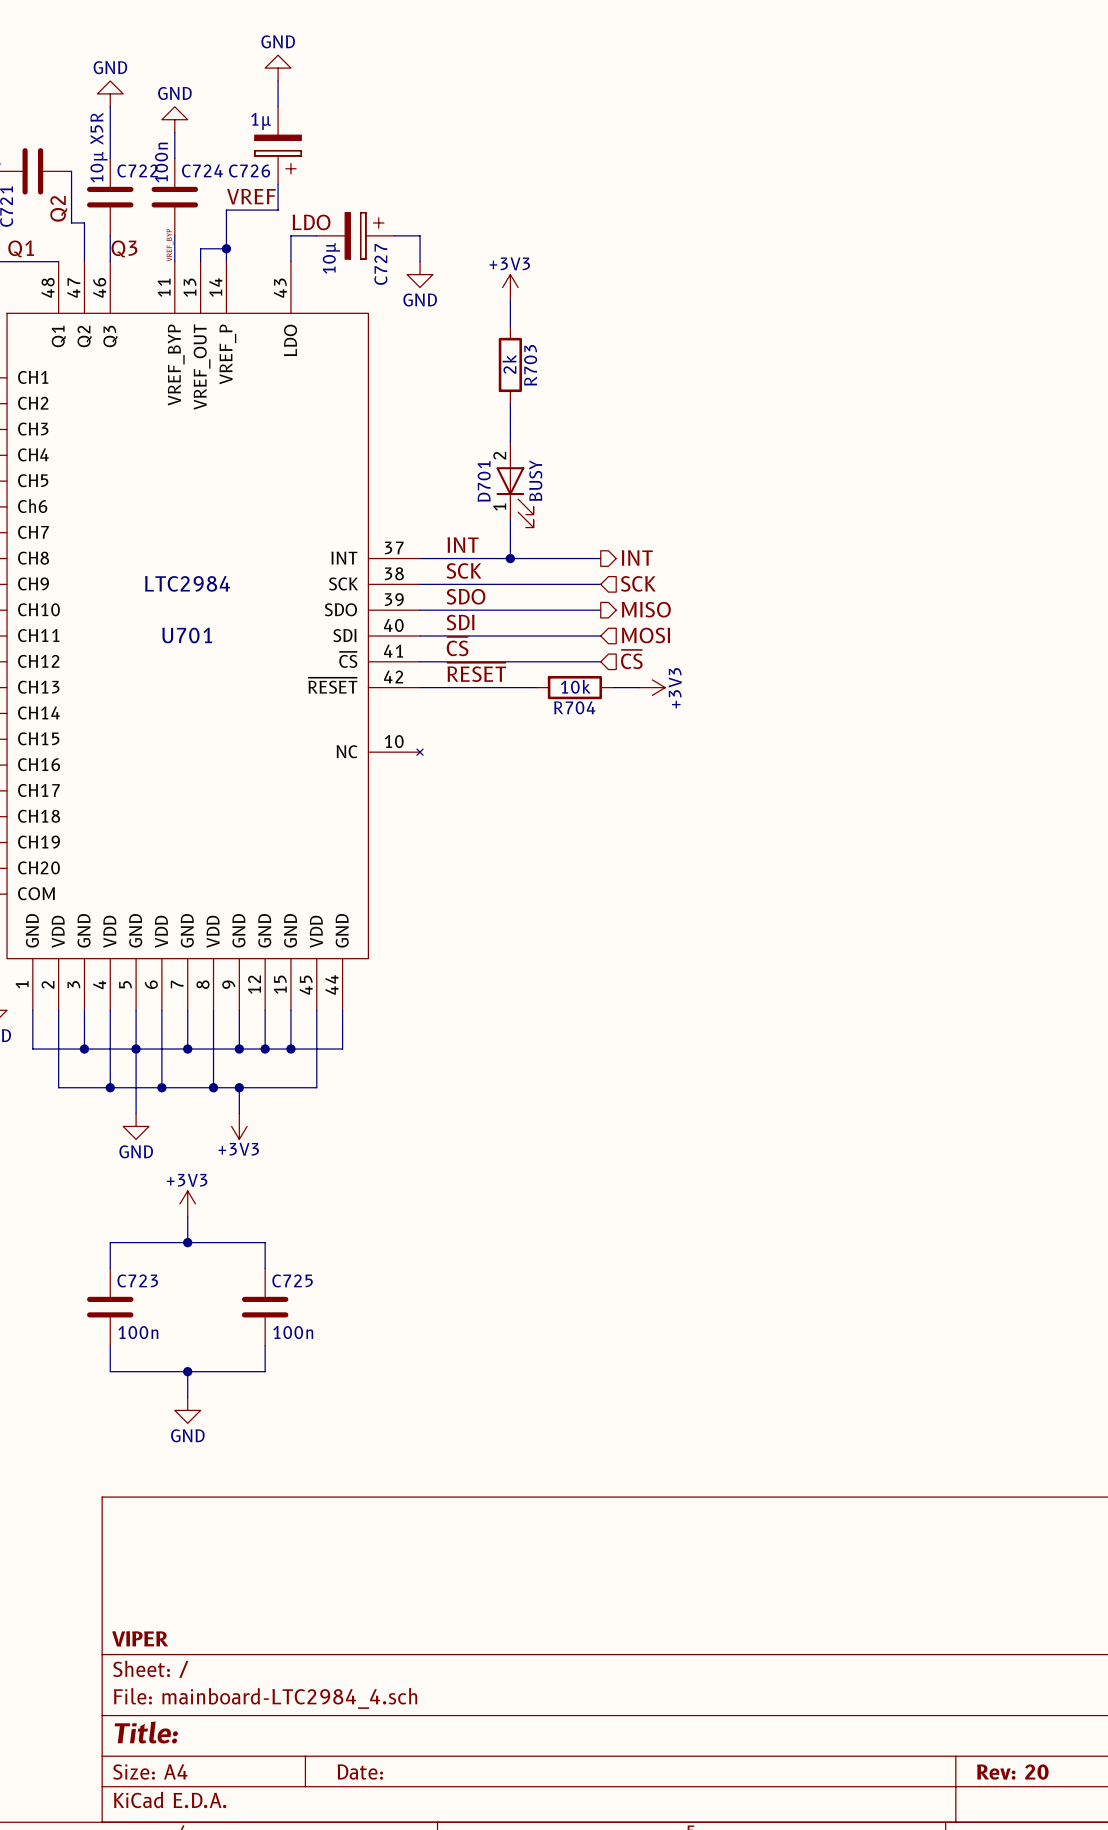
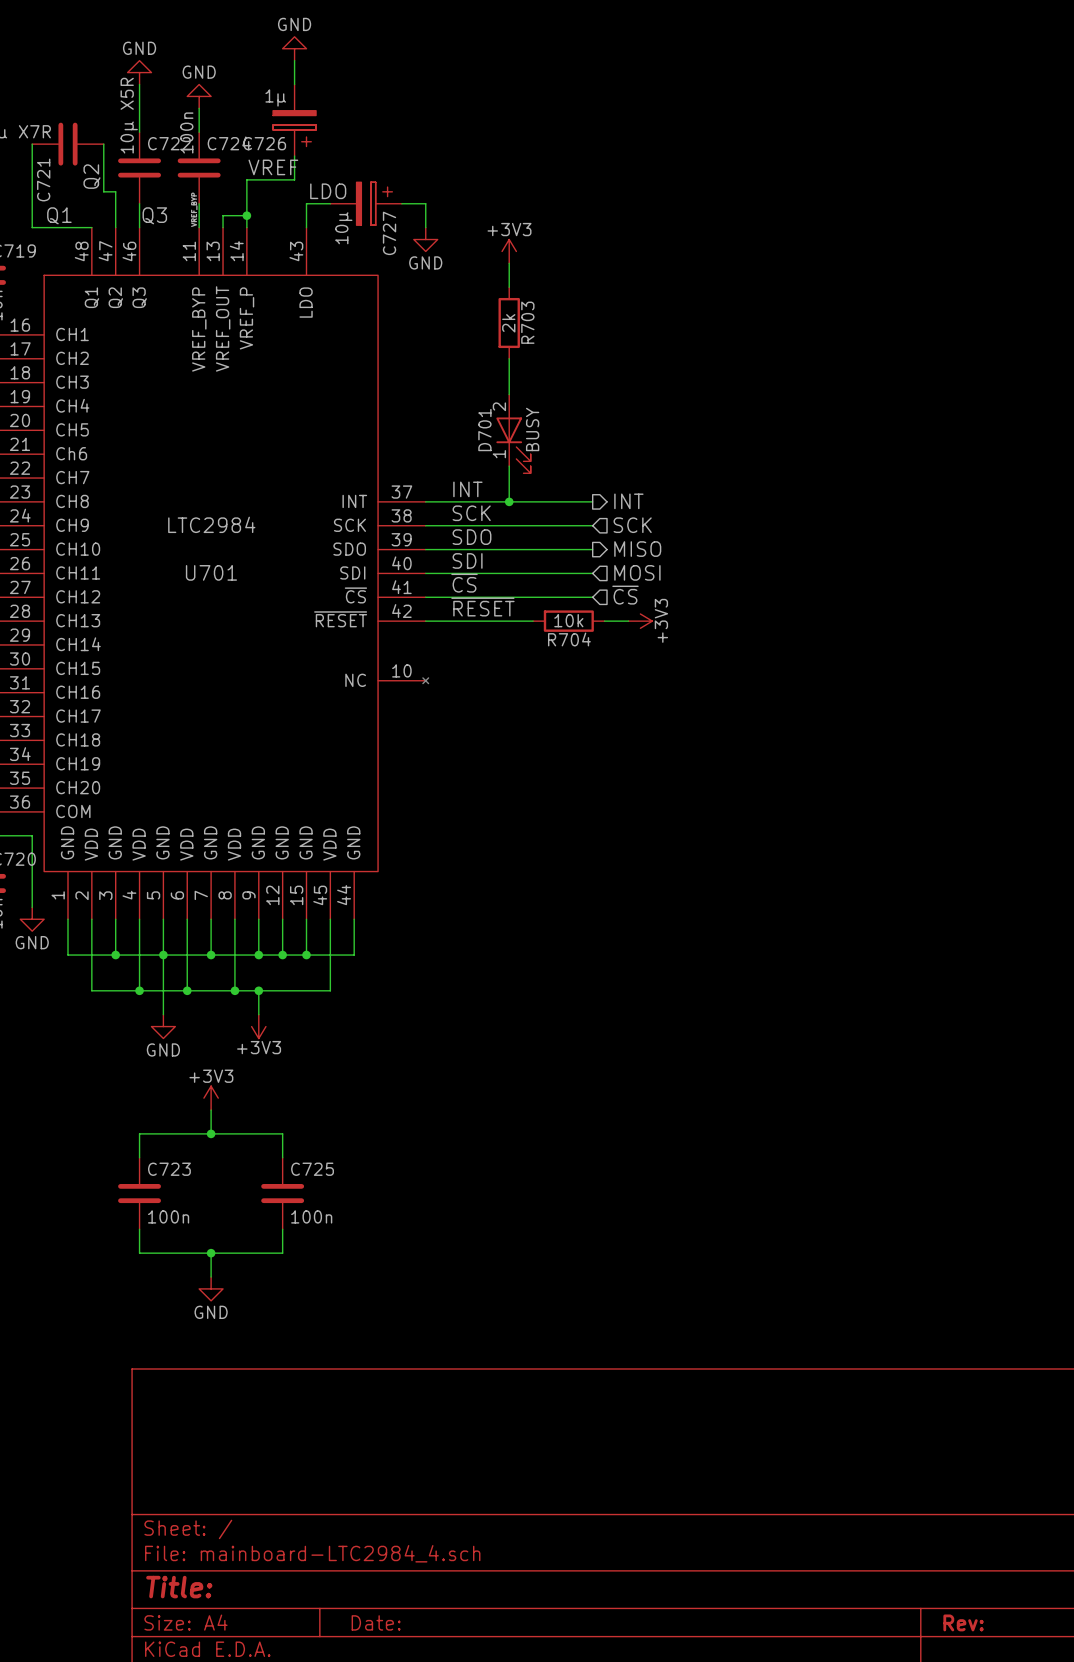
title block: VIPER (140, 1638) -> none
title block: Rev: 20 (1012, 1772) -> Rev: (963, 1622)

